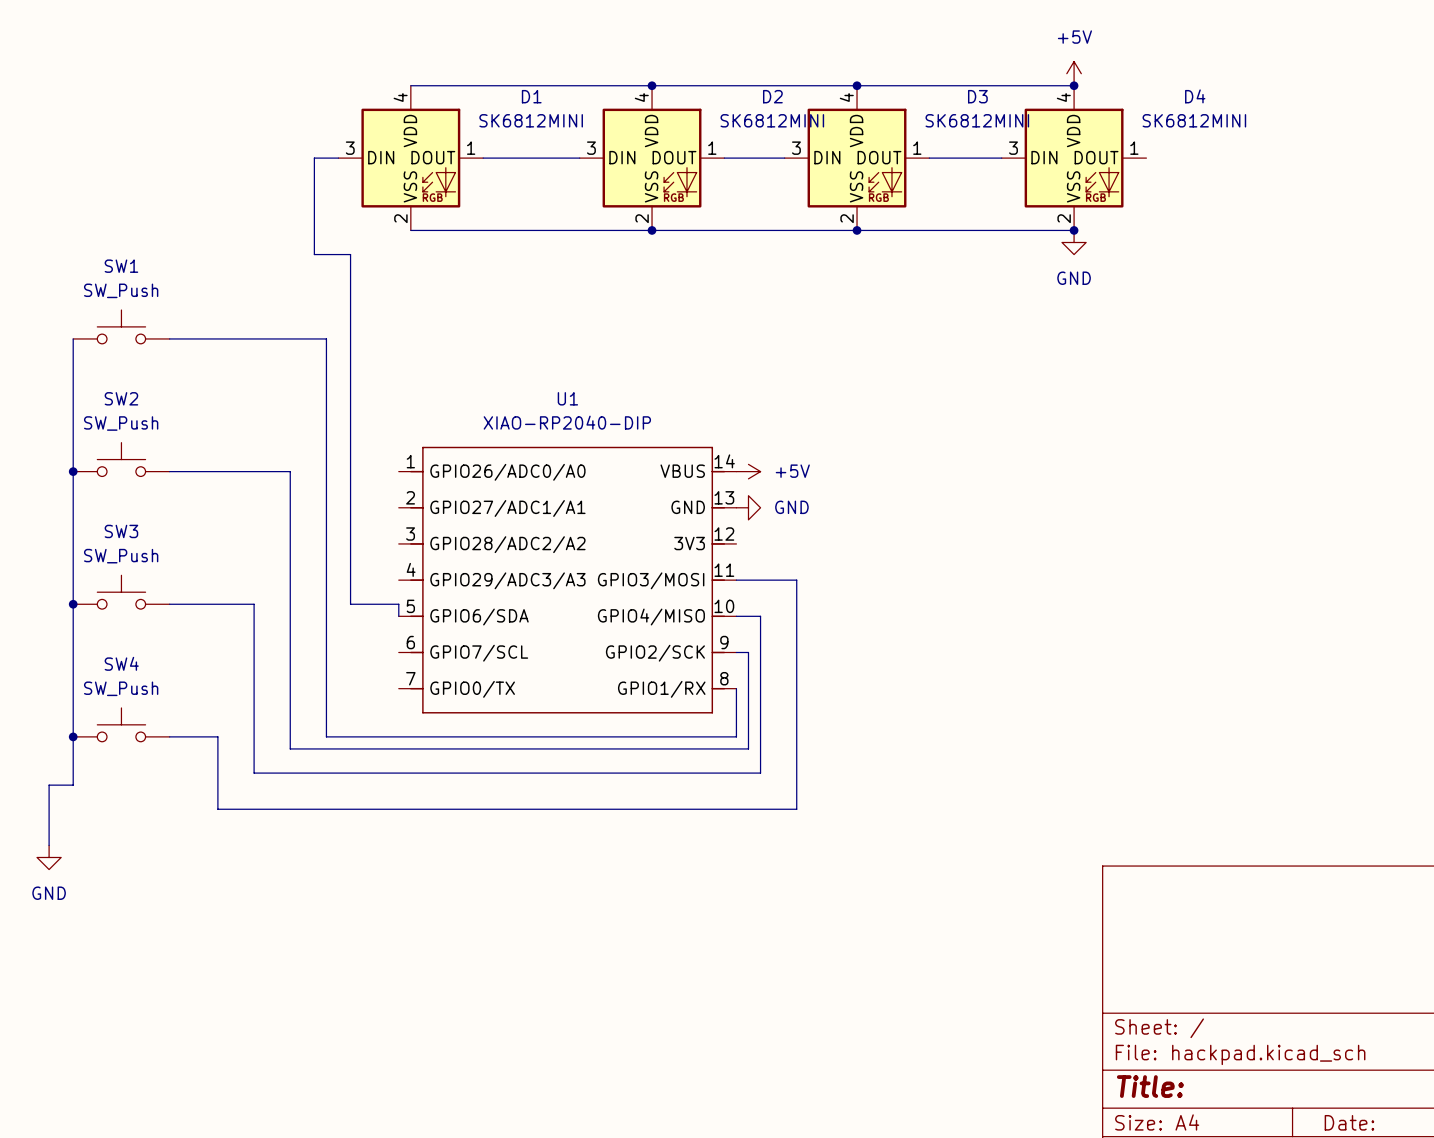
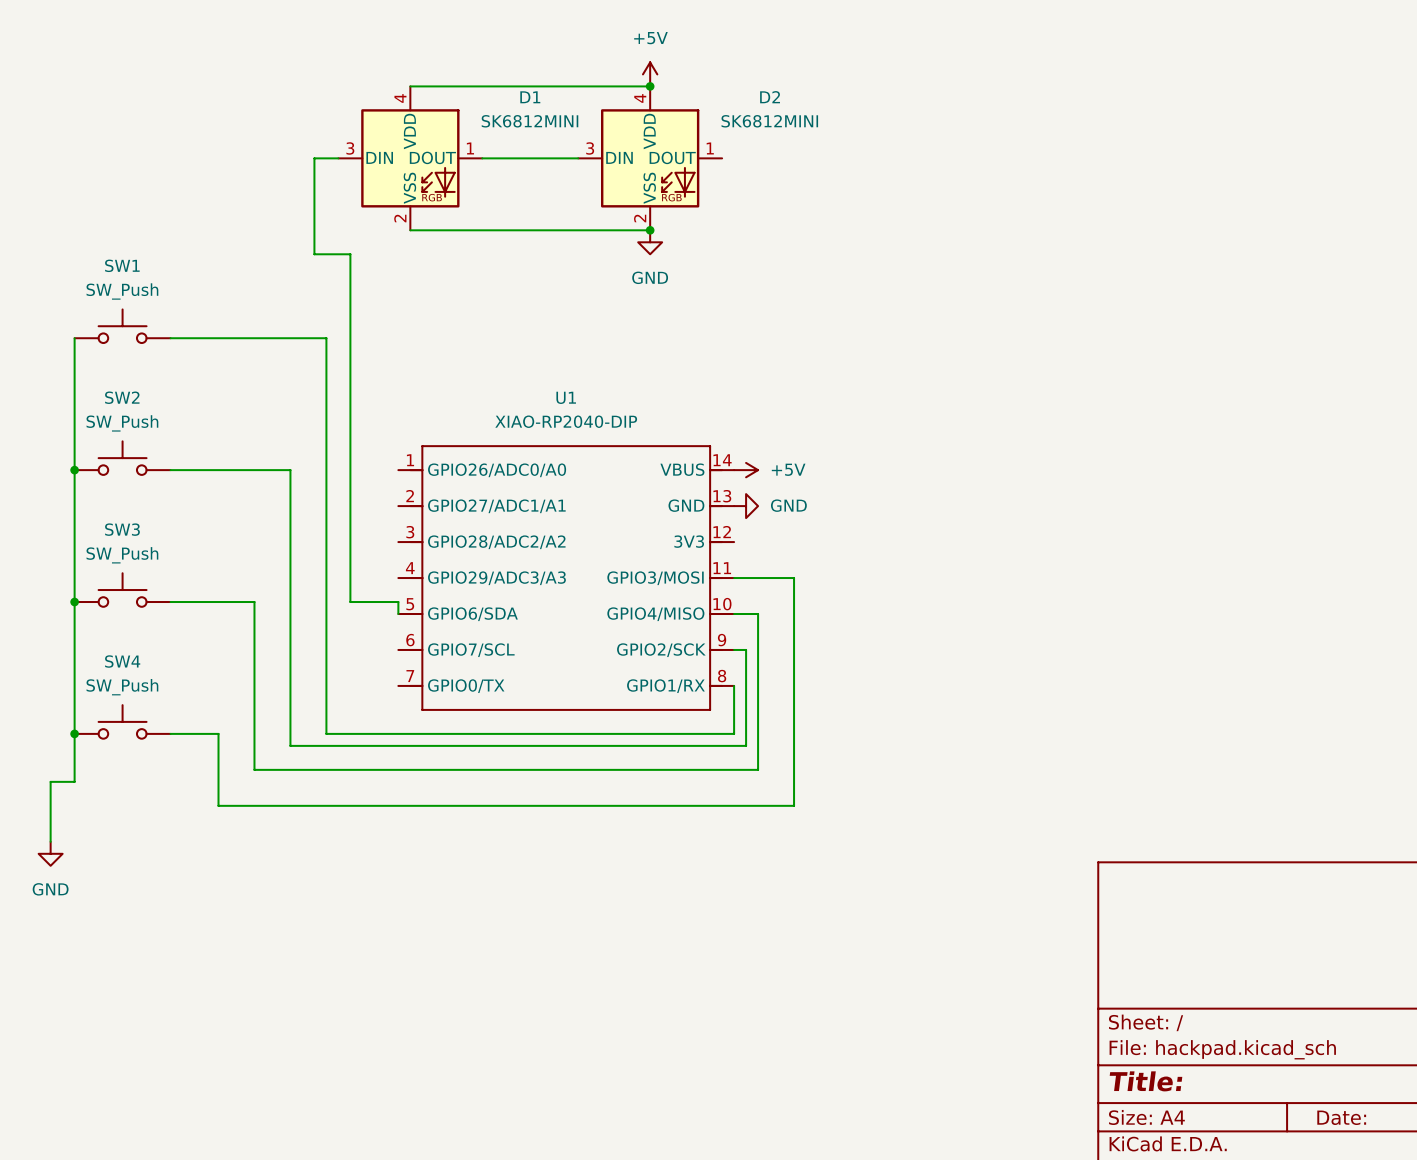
power symbol: none -> +5V (650, 74)
power symbol: +5V (1074, 73) -> none
wire: (652, 85) (1074, 85) -> none
junction: (857, 85) -> none
junction: (1074, 85) -> none
wire: (724, 158) (784, 158) -> none
D3: SK6812MINI (857, 158) -> none
wire: (929, 158) (1001, 158) -> none
D4: SK6812MINI (1074, 158) -> none
wire: (652, 230) (1074, 230) -> none
junction: (857, 230) -> none
junction: (1074, 230) -> none
power symbol: none -> GND (650, 242)
power symbol: GND (1074, 242) -> none

